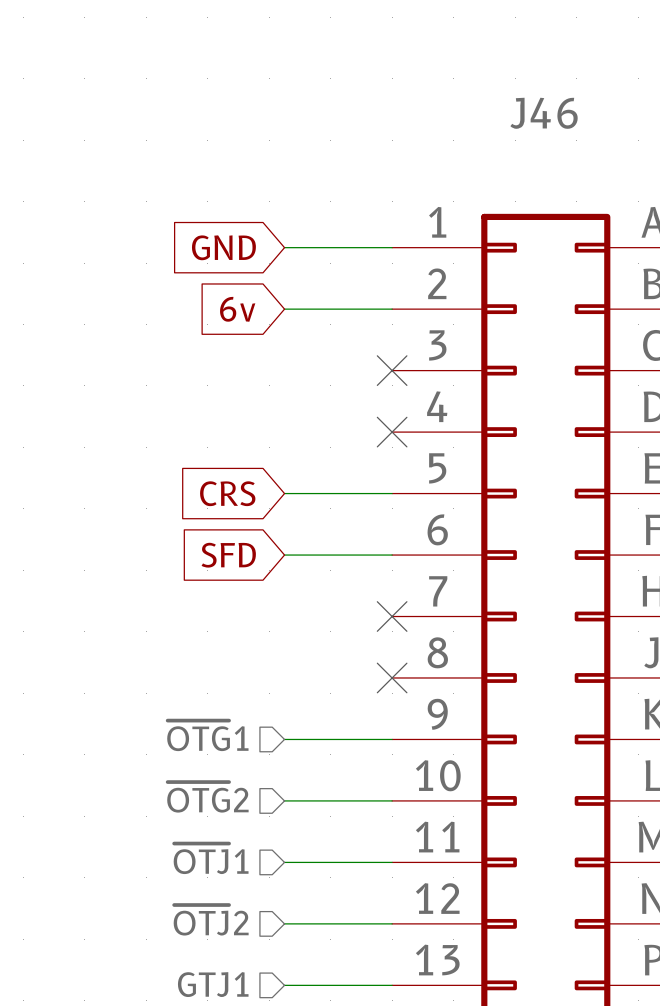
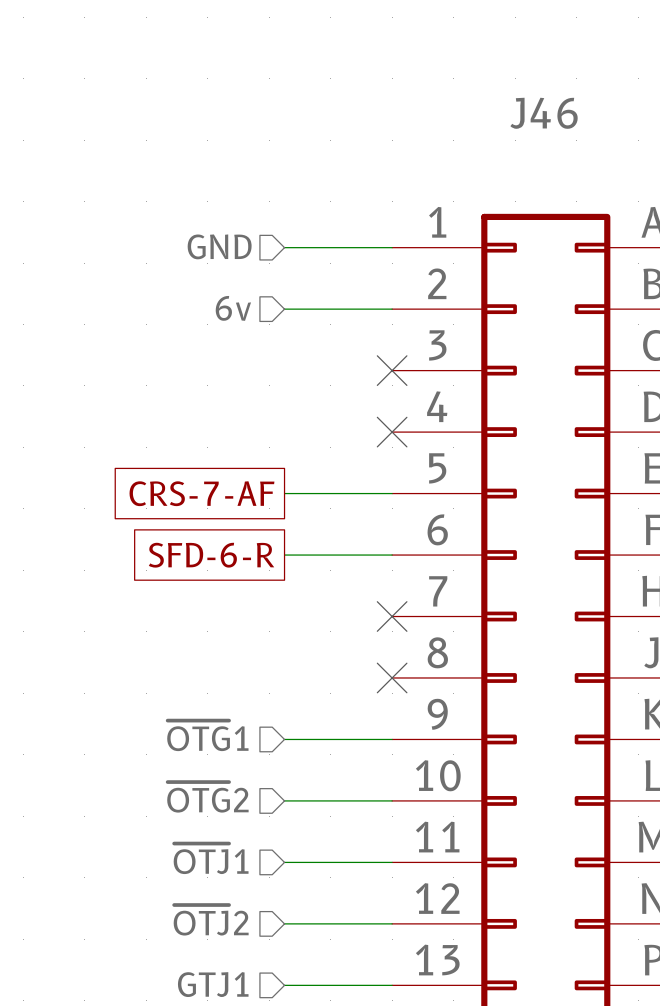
hierarchical label: none -> GND (219, 246)
global label: GND (223, 247) -> none
hierarchical label: none -> 6v (233, 308)
global label: 6v (237, 309) -> none
global label shape: input (227, 493) -> passive (201, 493)
global label: CRS (227, 493) -> CRS-7-AF (201, 493)
global label shape: input (228, 555) -> passive (211, 555)
global label: SFD (228, 555) -> SFD-6-R (211, 555)

